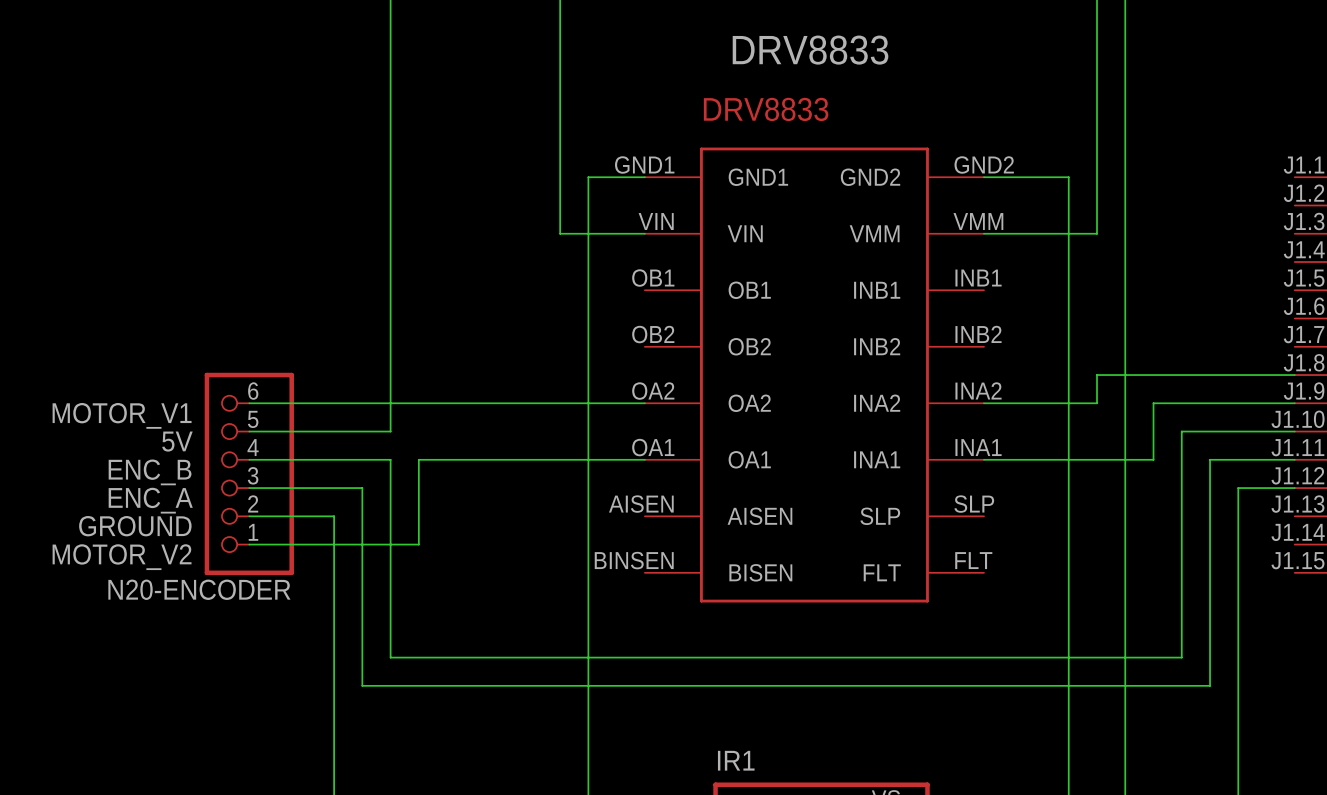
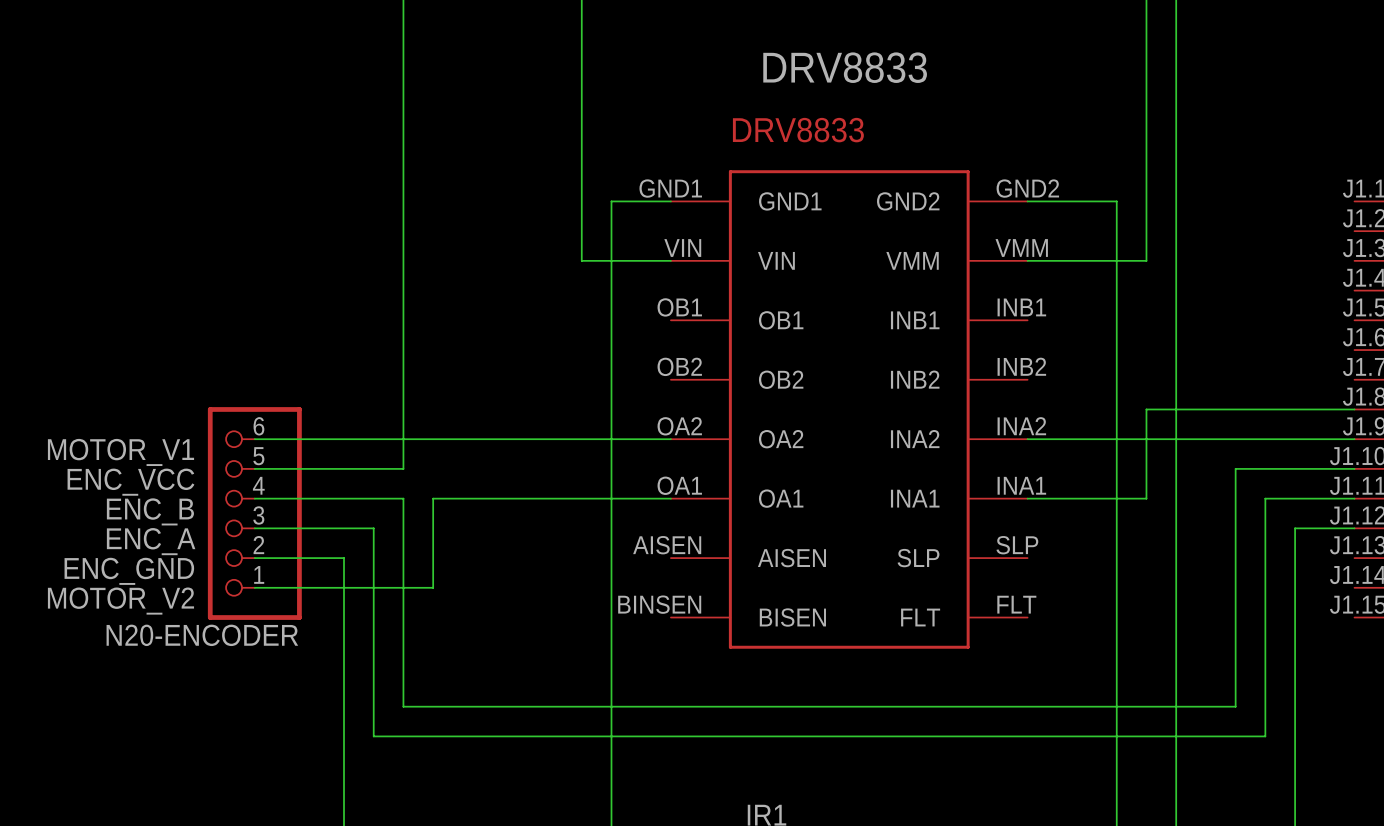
wire: (1153, 403) (1153, 459) (1097, 459) -> (1205, 439) (1146, 439) (1146, 498)
label: 5V (177, 441) -> ENC_VCC (130, 482)
label: GROUND (135, 526) -> ENC_GND (129, 571)

